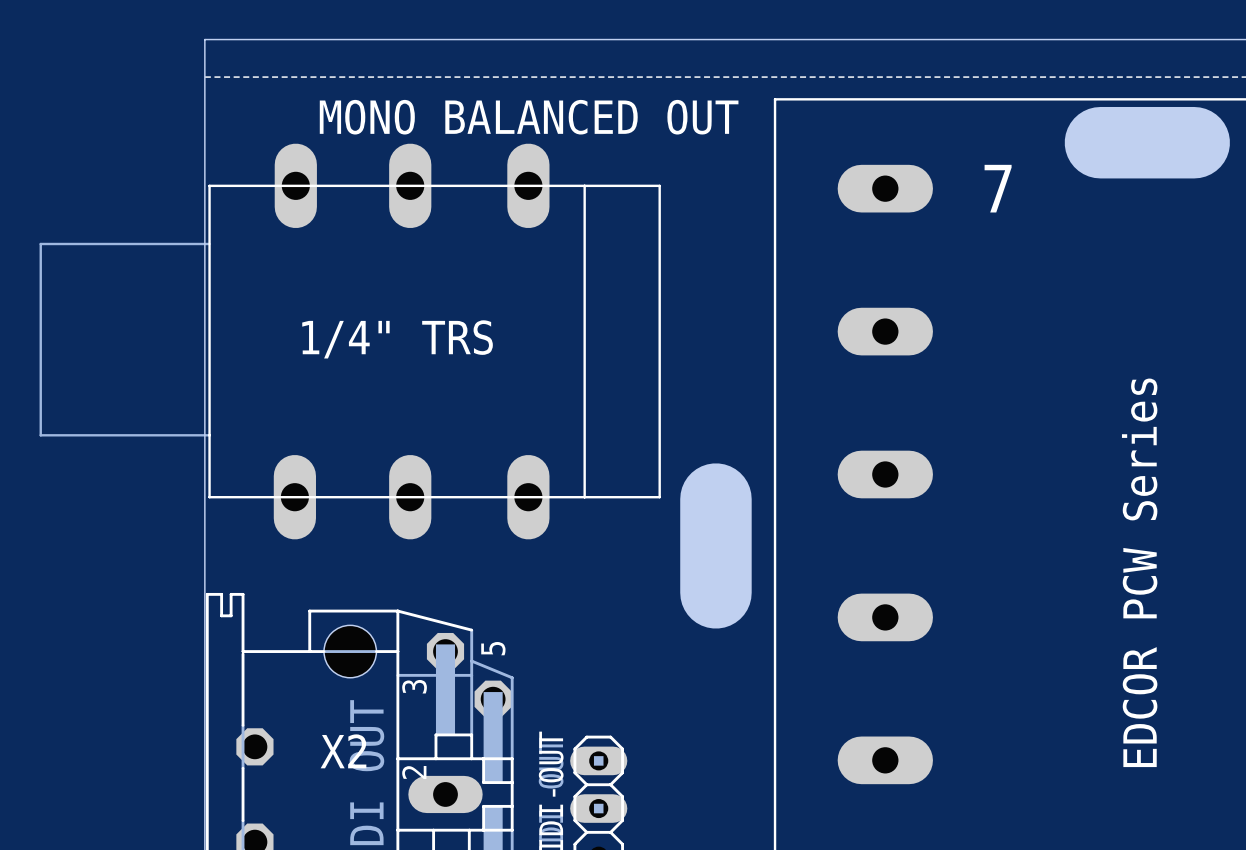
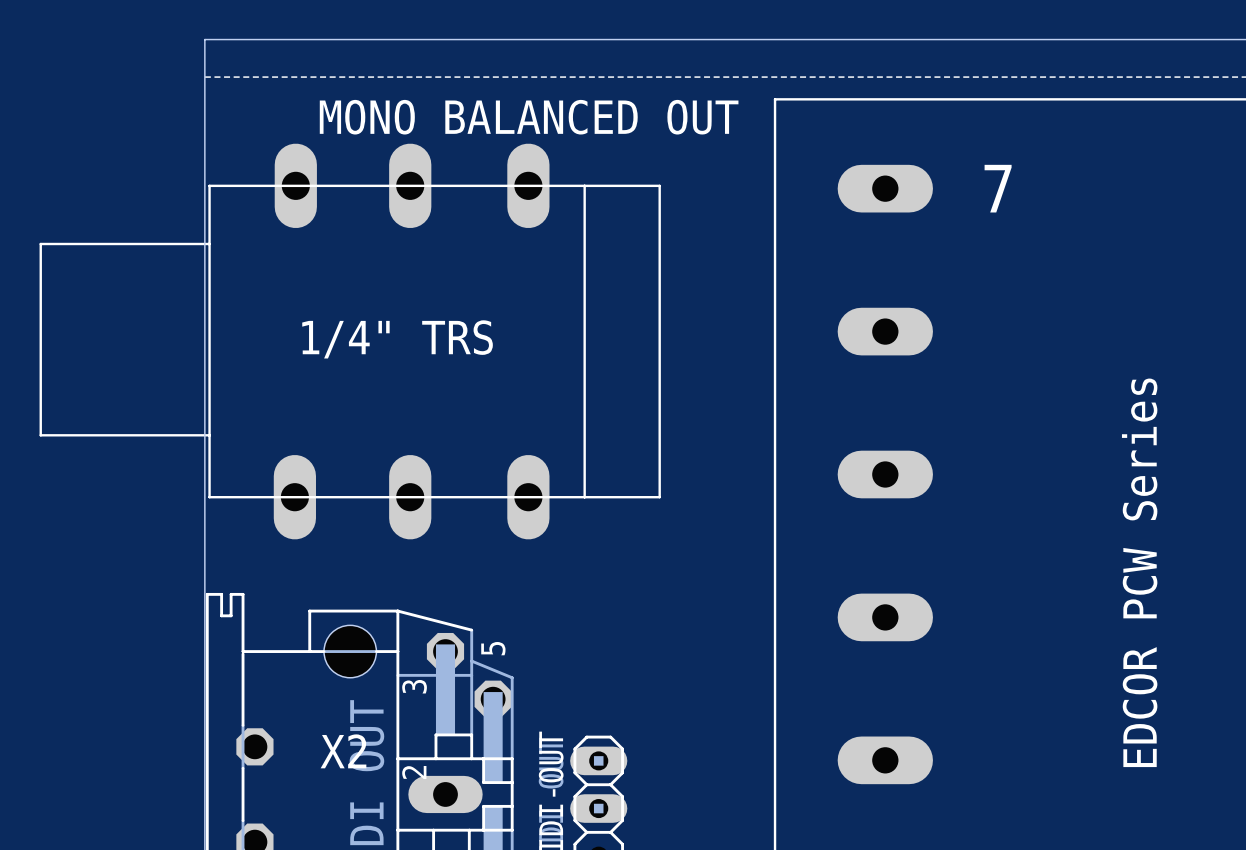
board edge: (1100, 142) (1194, 142) -> none
part footprint: [39, 143, 661, 540] -> [39, 143, 661, 540]
board edge: (715, 499) (715, 592) -> none

